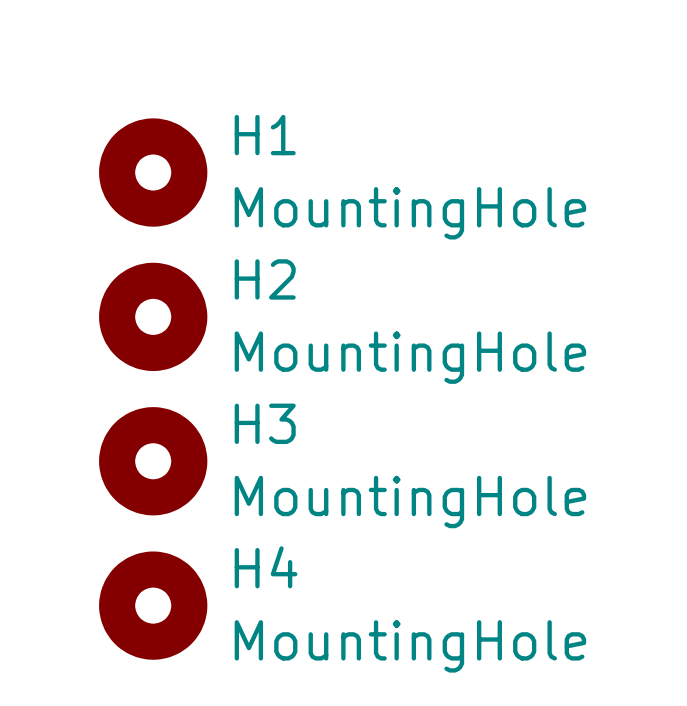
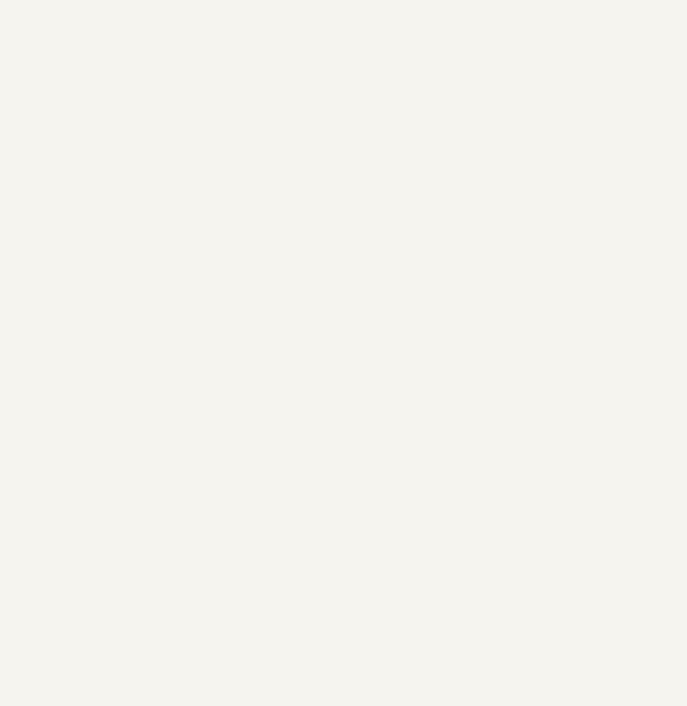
H1: MountingHole (153, 172) -> none
H2: MountingHole (153, 316) -> none
H3: MountingHole (153, 461) -> none
H4: MountingHole (153, 605) -> none

